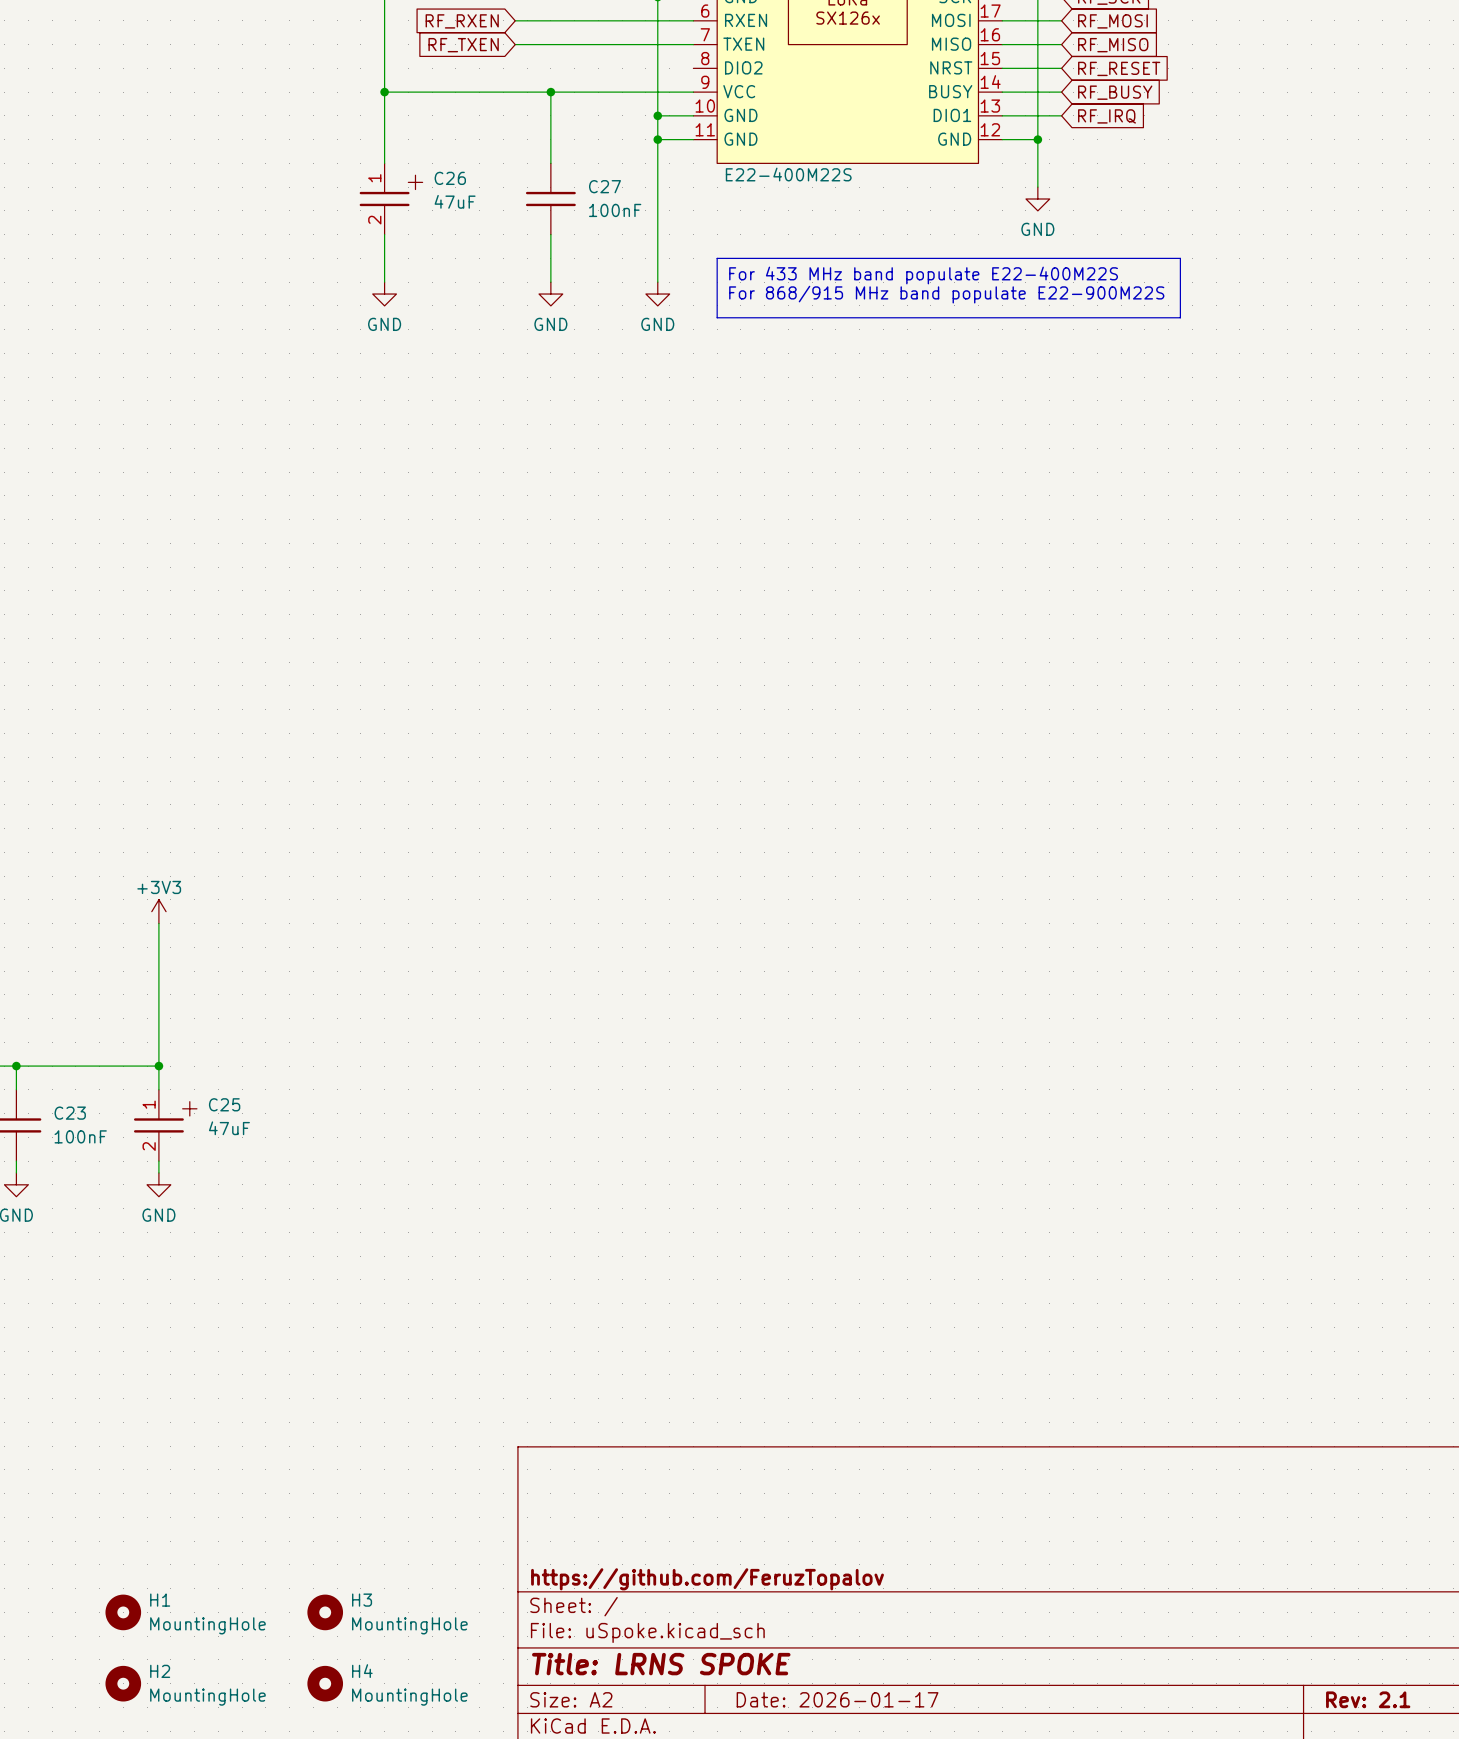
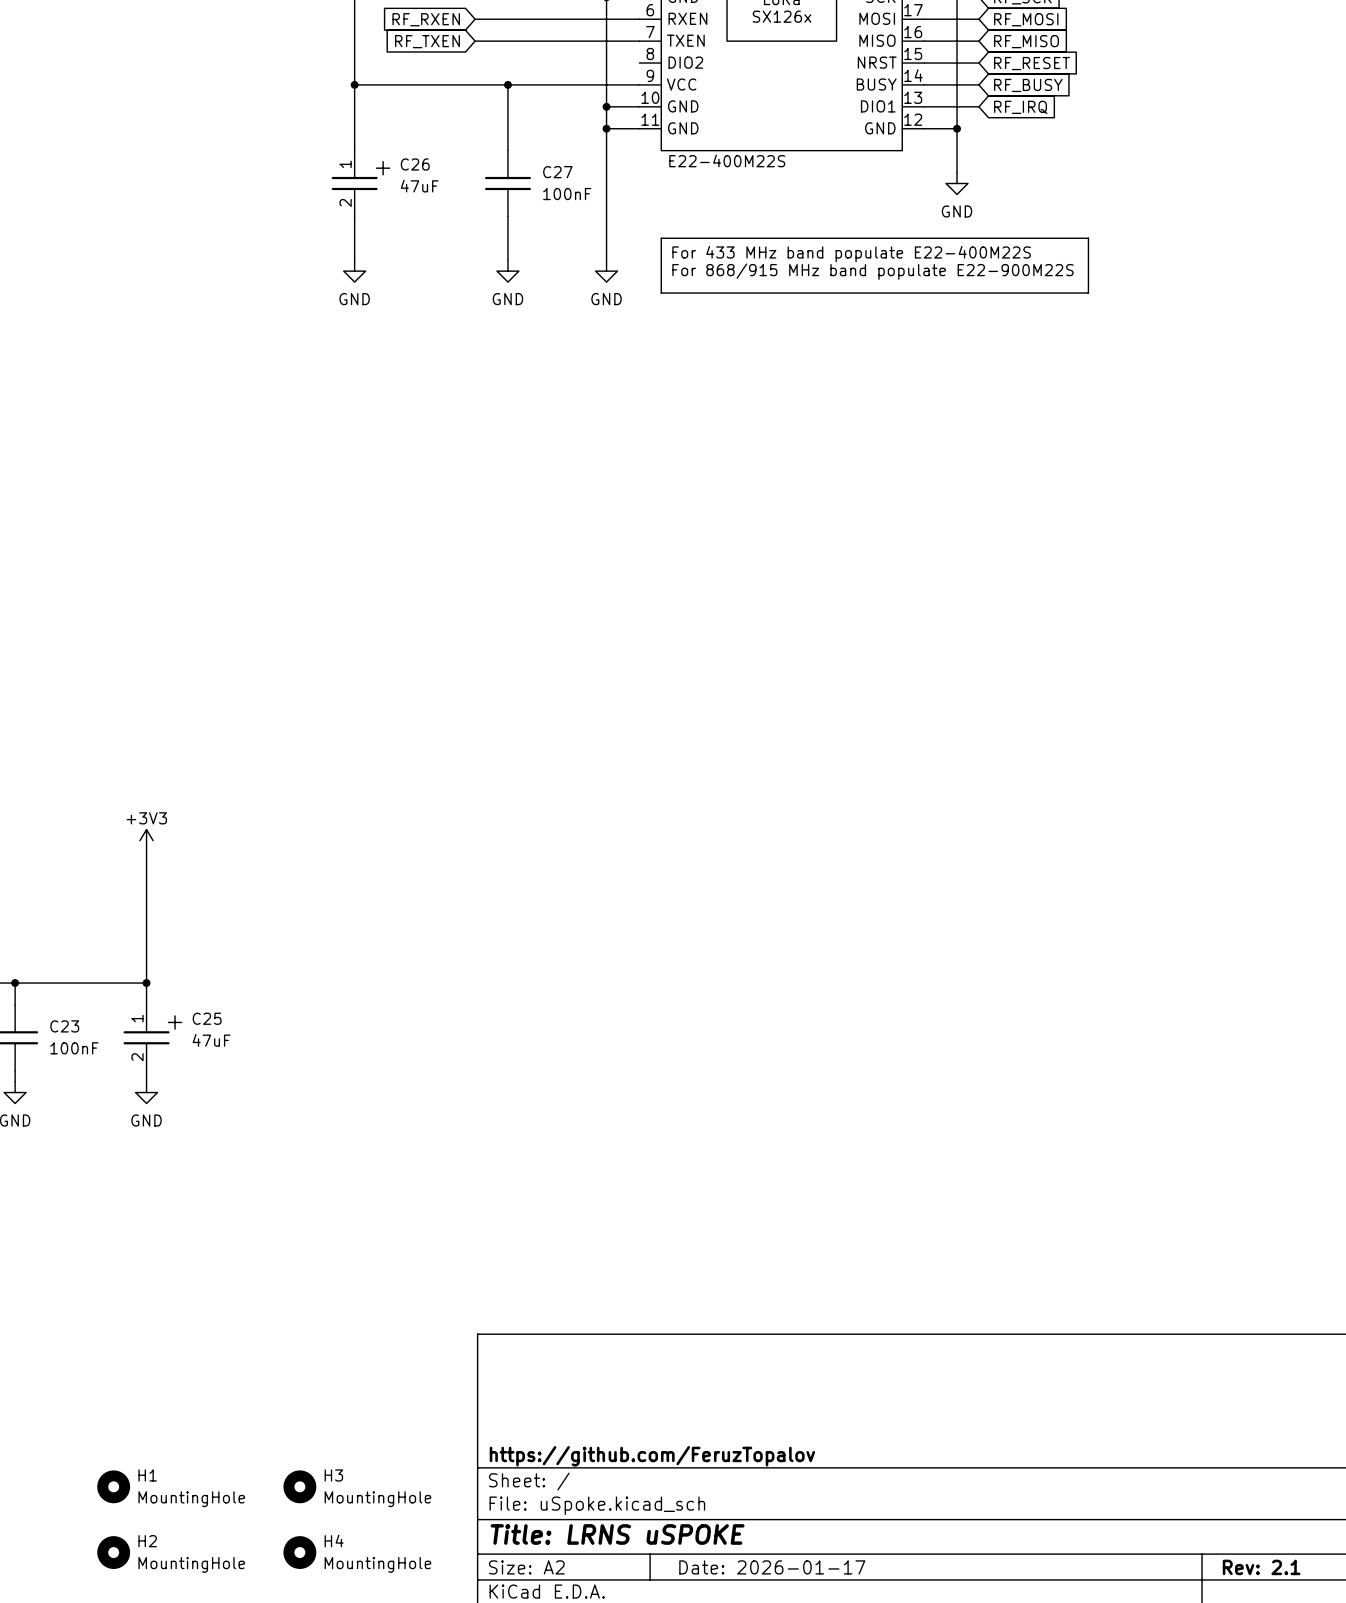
title block: Title: LRNS SPOKE (661, 1664) -> Title: LRNS uSPOKE (617, 1534)

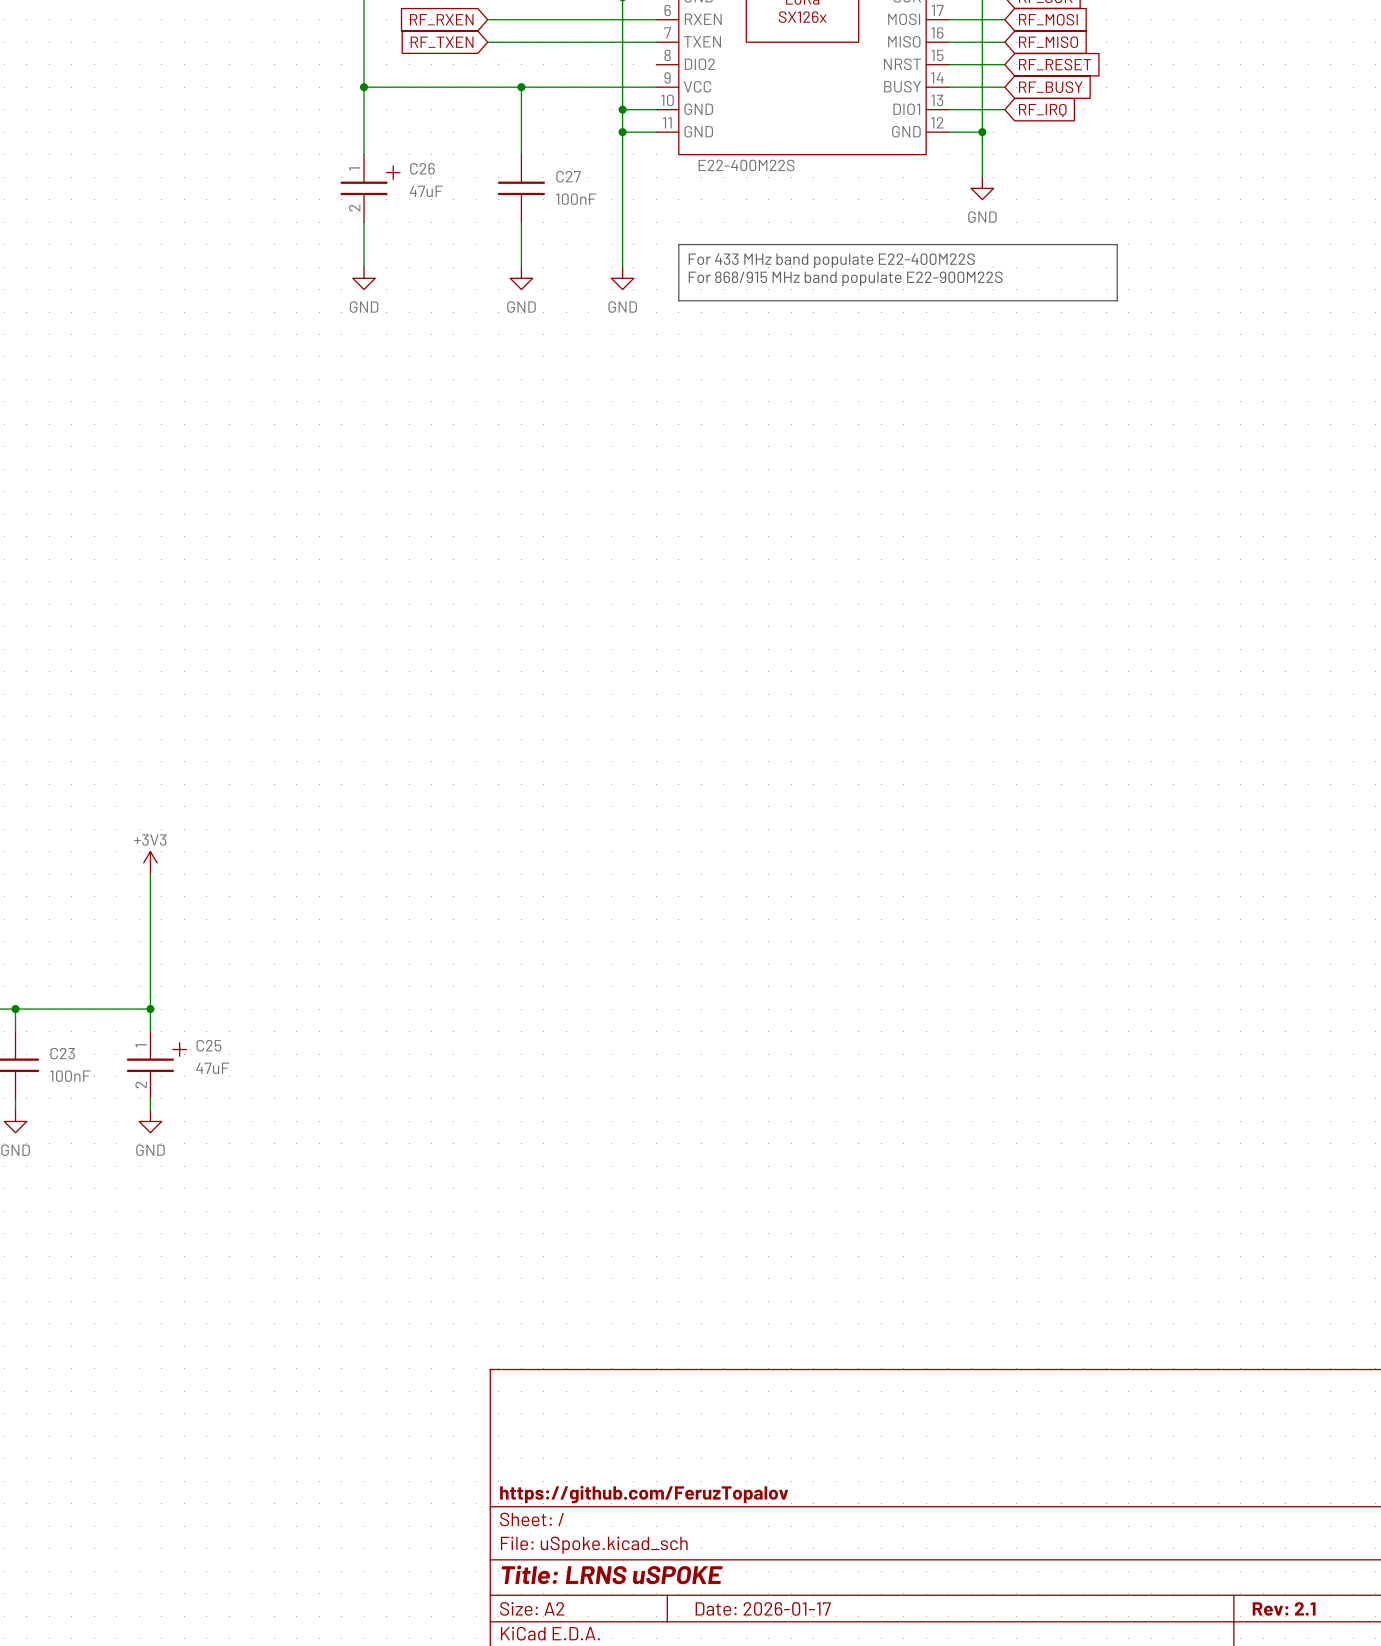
H1: MountingHole (113, 1486) -> none
H3: MountingHole (299, 1486) -> none
H2: MountingHole (113, 1552) -> none
H4: MountingHole (299, 1552) -> none

